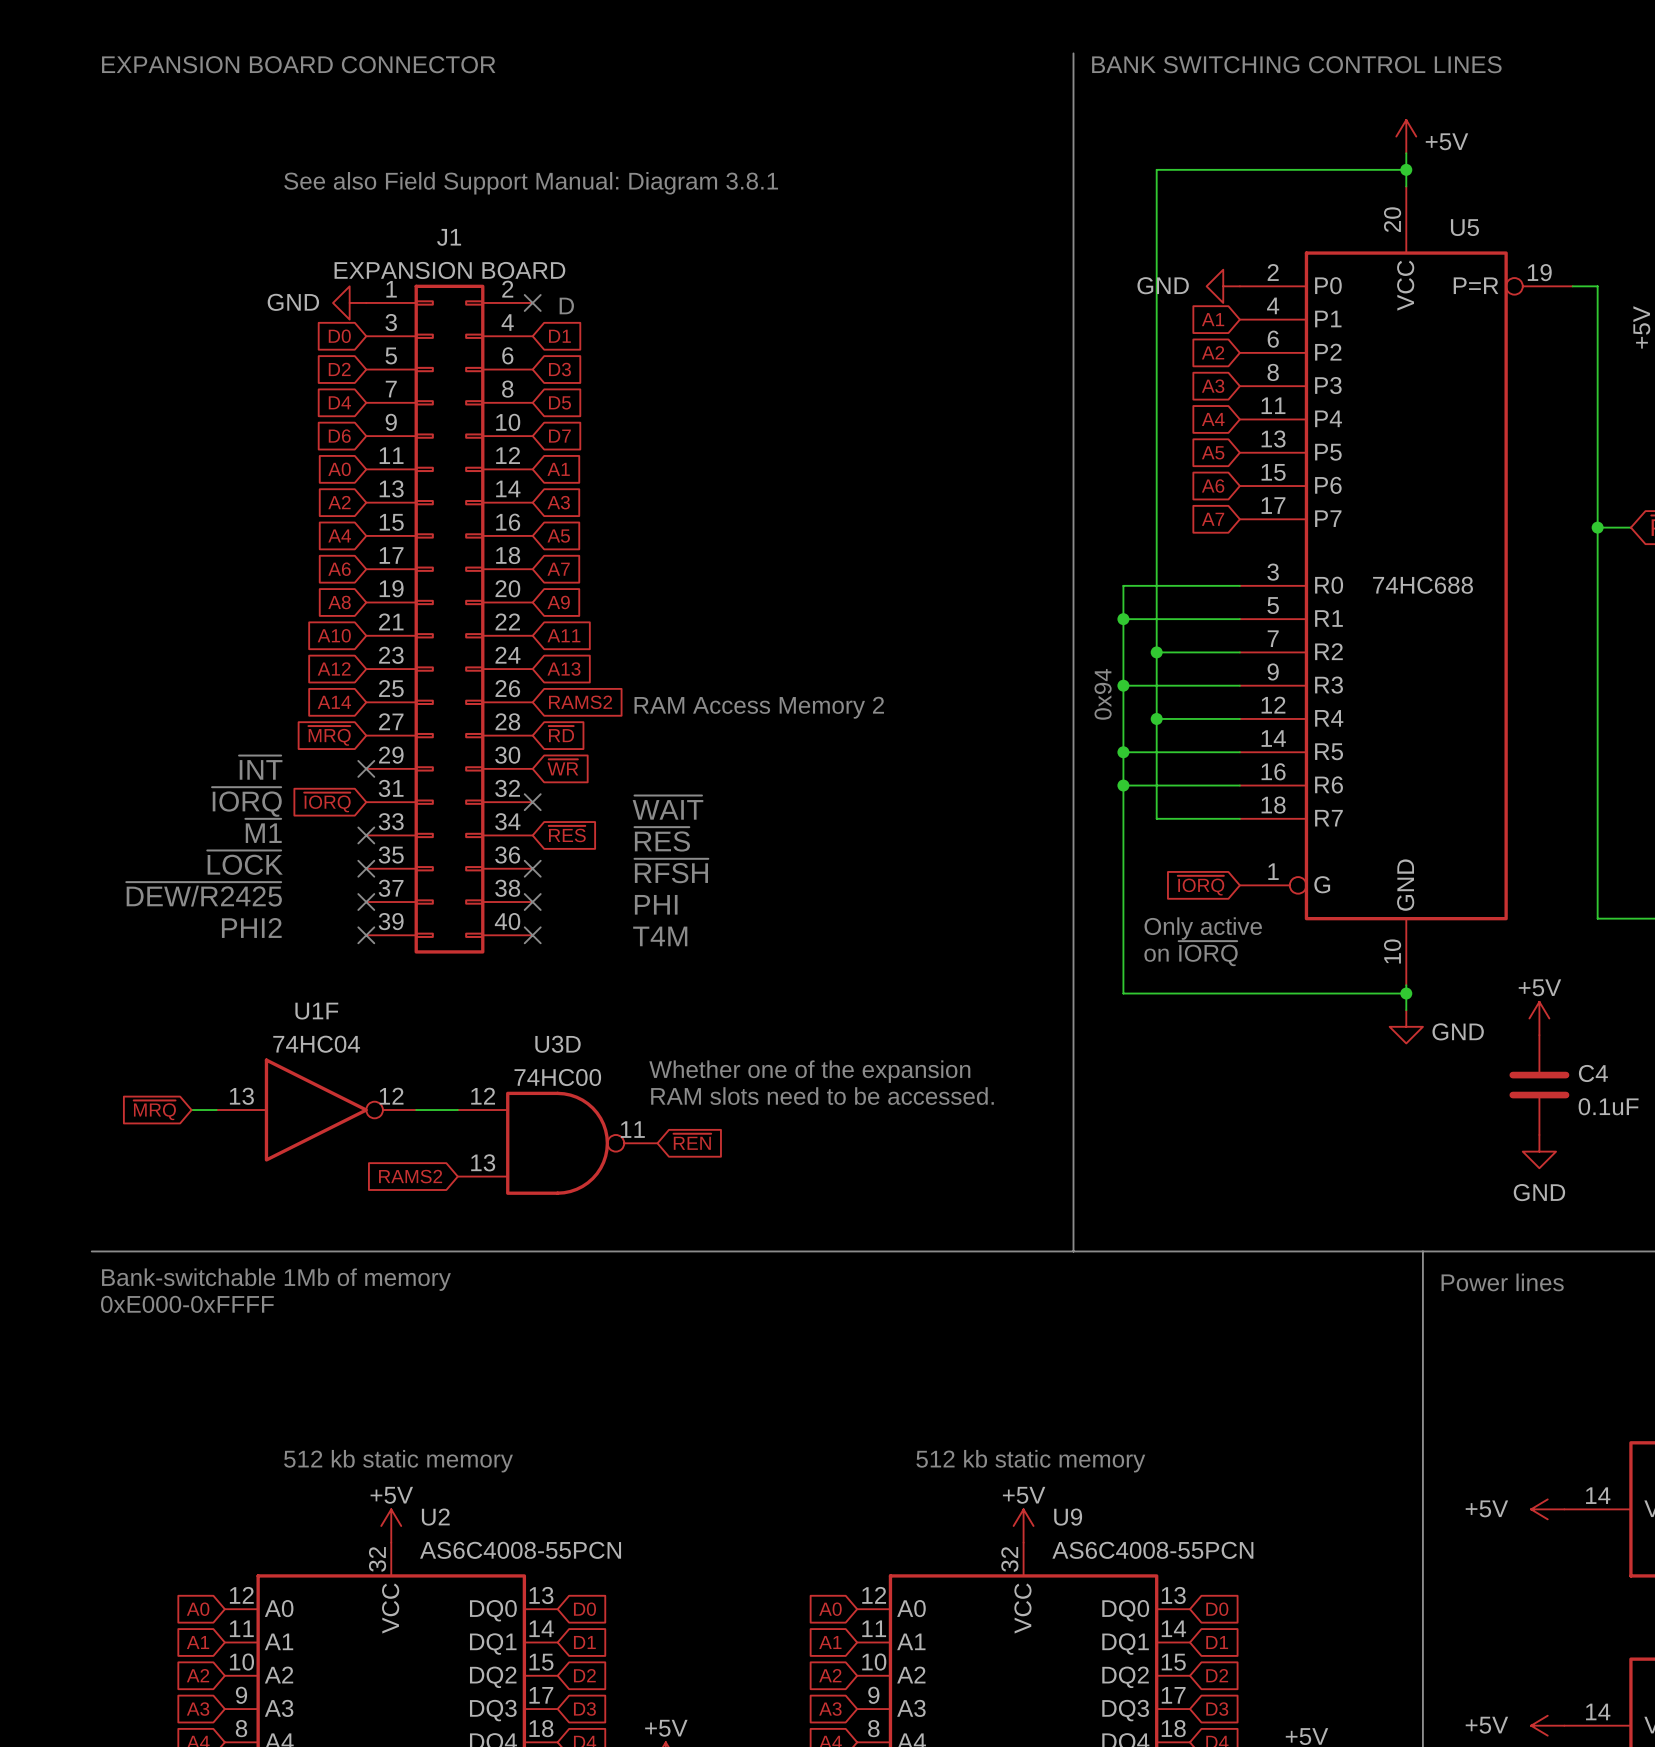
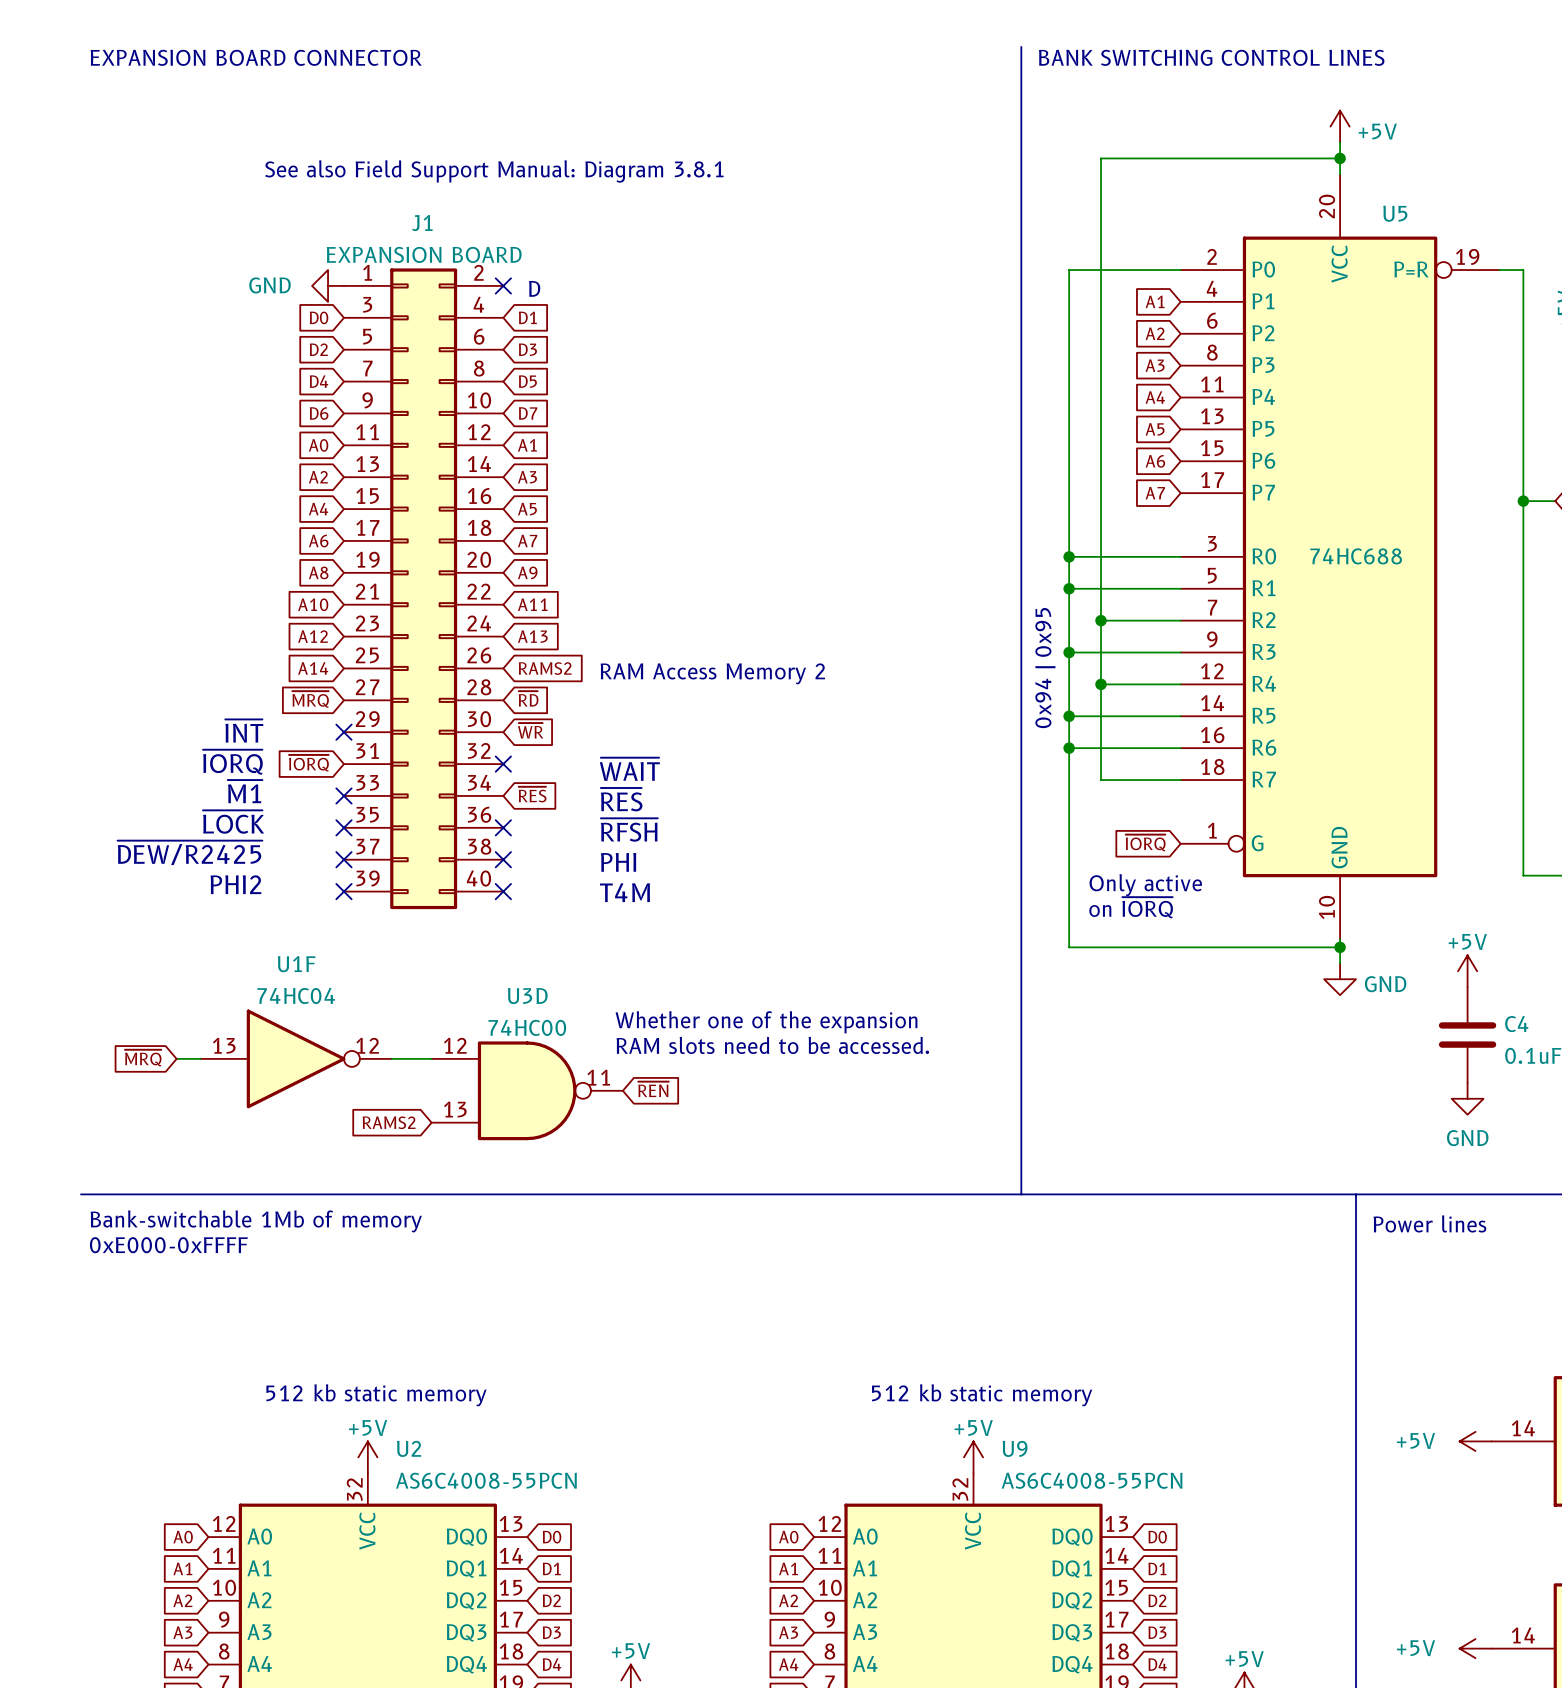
power symbol: GND (1223, 286) -> none
wire: none -> (1180, 270) (1069, 270) (1069, 556)
junction: none -> (1069, 556)
text: 0x94 (1103, 694) -> none
text: none -> 0x94 | 0x95 (1045, 668)

